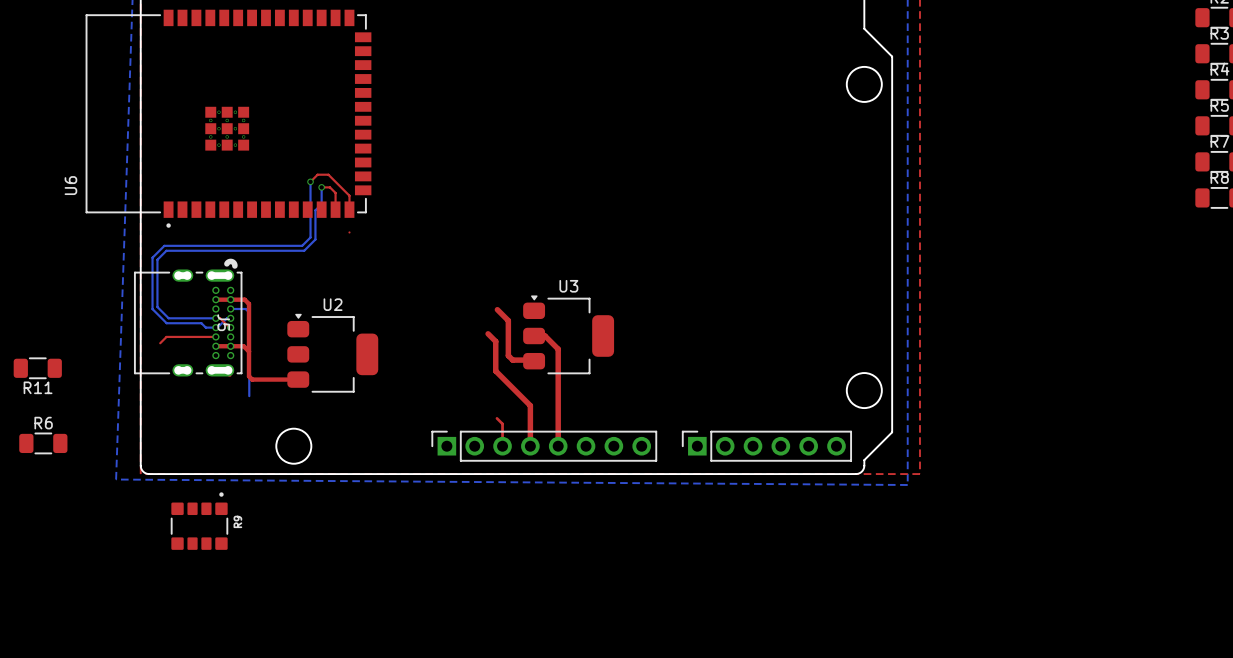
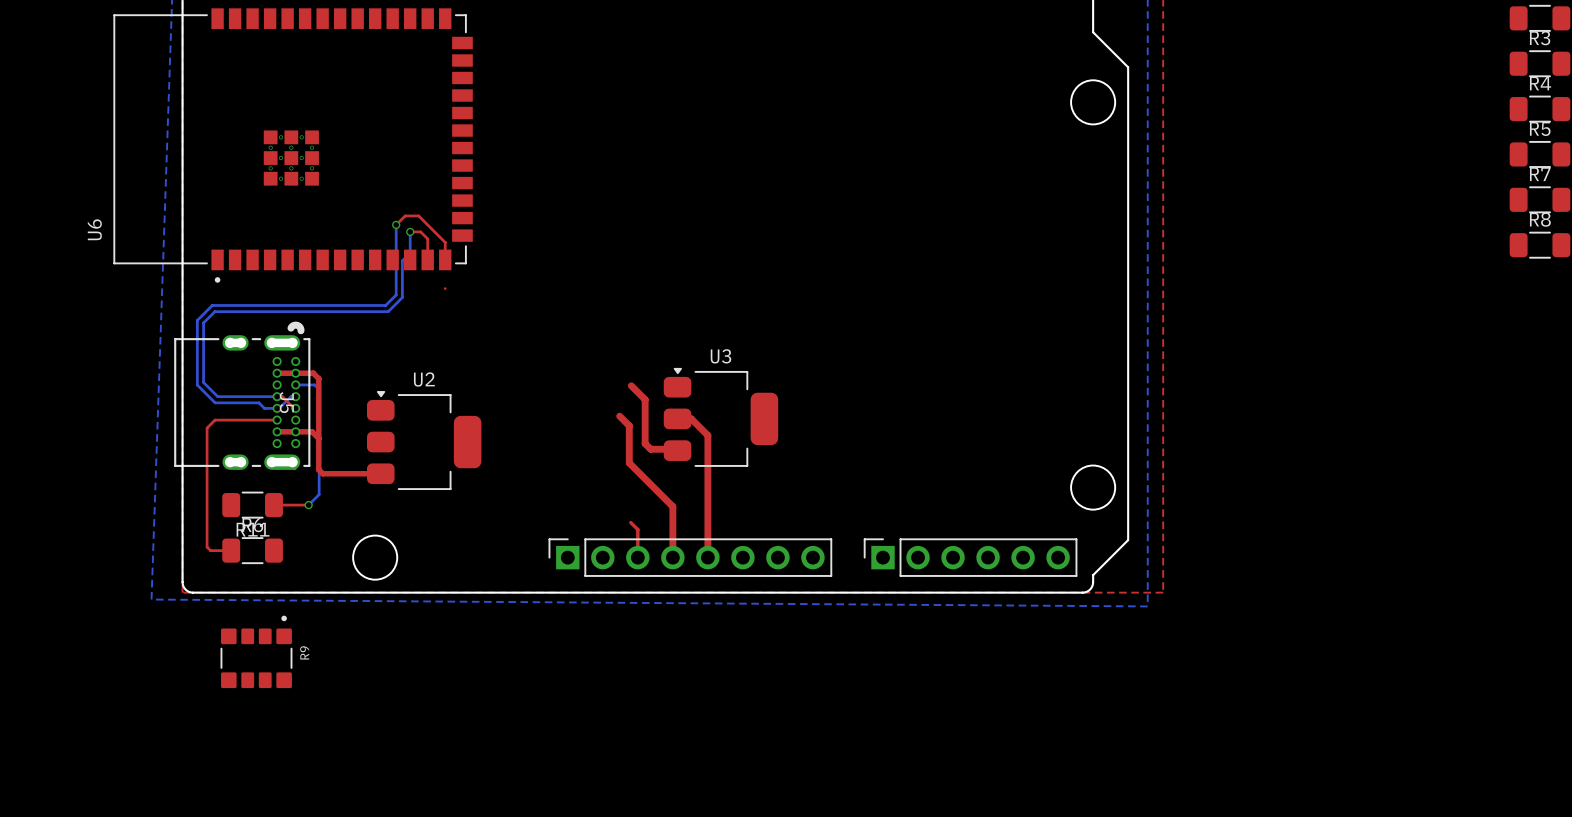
top track: none -> (207, 428) (207, 547) (210, 550) (231, 550)
R11 position: (37, 368) -> (252, 505)
bottom track: none -> (319, 494) (308, 505)
top track: none -> (273, 505) (308, 505)
via: none -> (308, 505)
R6 position: (43, 443) -> (252, 550)

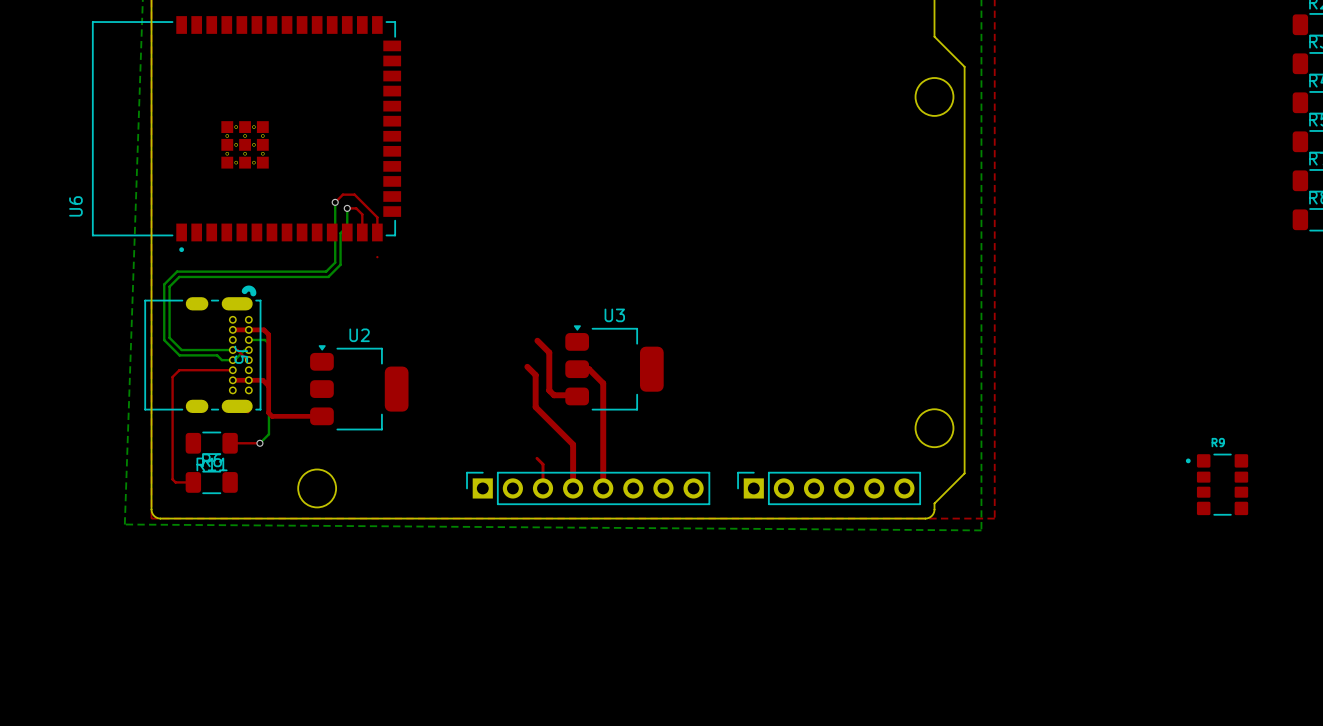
R9 rotation: 0° (256, 651) -> 90° counterclockwise (1217, 484)
R9 position: (256, 651) -> (1217, 484)

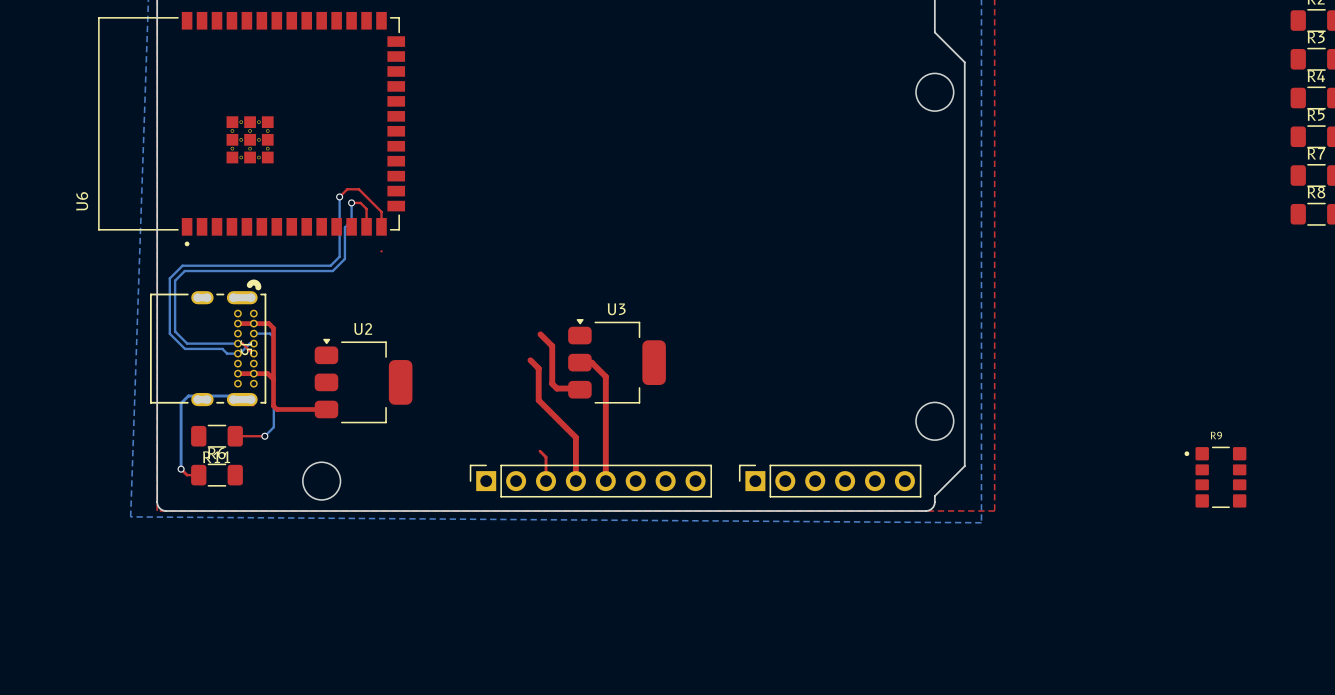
top track: (232, 370) (179, 370) (172, 377) (172, 479) (175, 482) (181, 482) -> (181, 469) (187, 475)
bottom track: none -> (238, 396) (188, 396) (181, 403) (181, 469)
via: none -> (181, 469)

